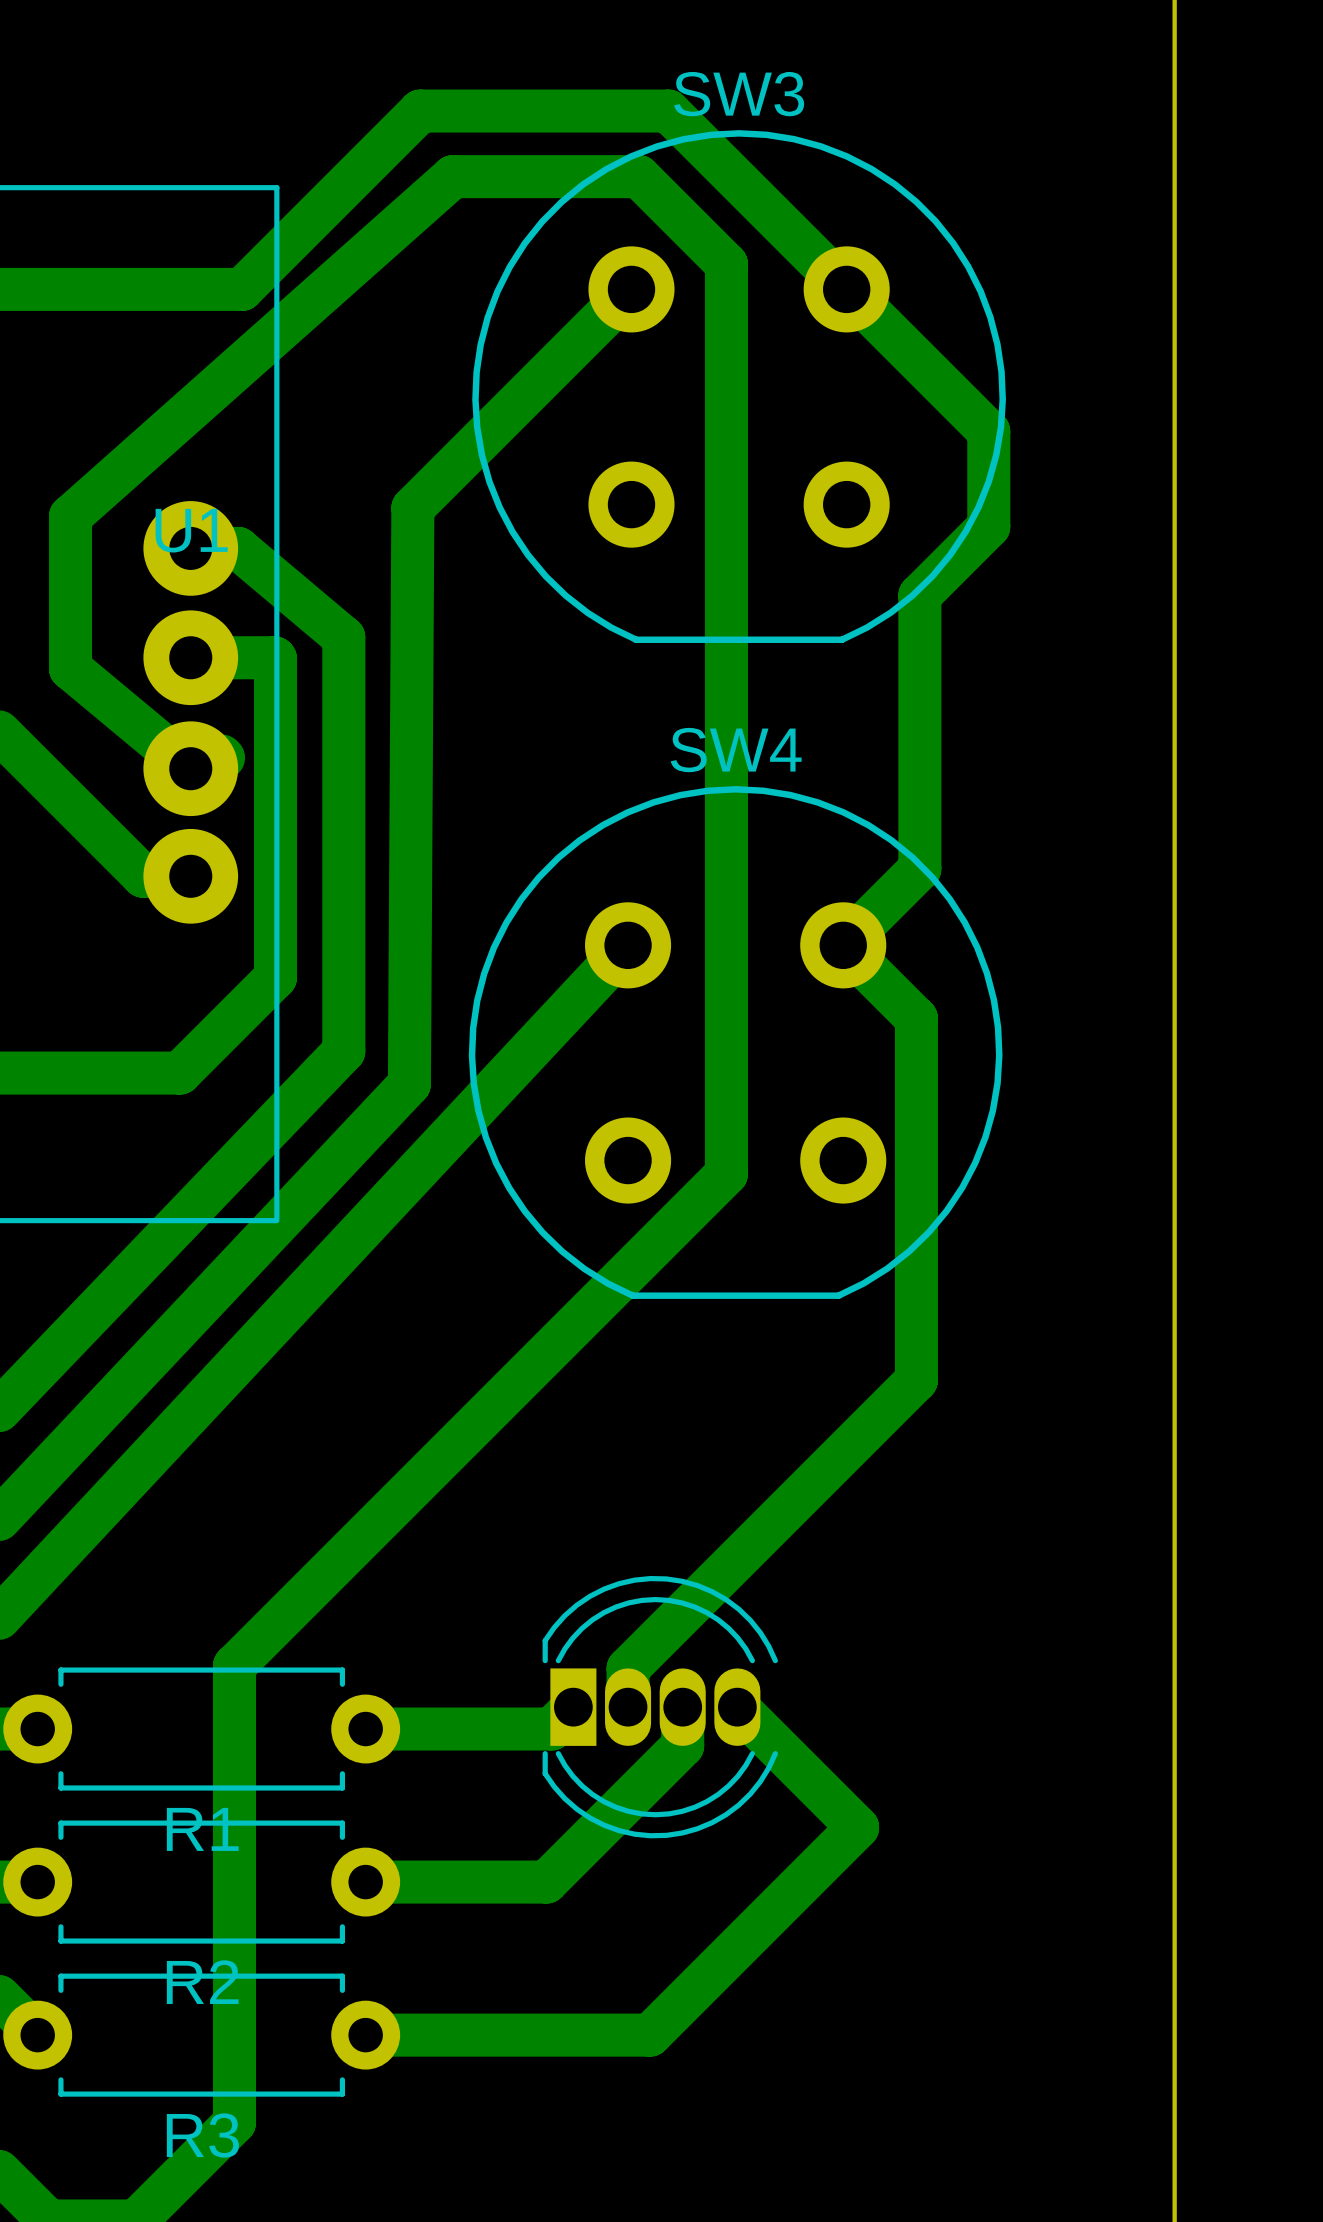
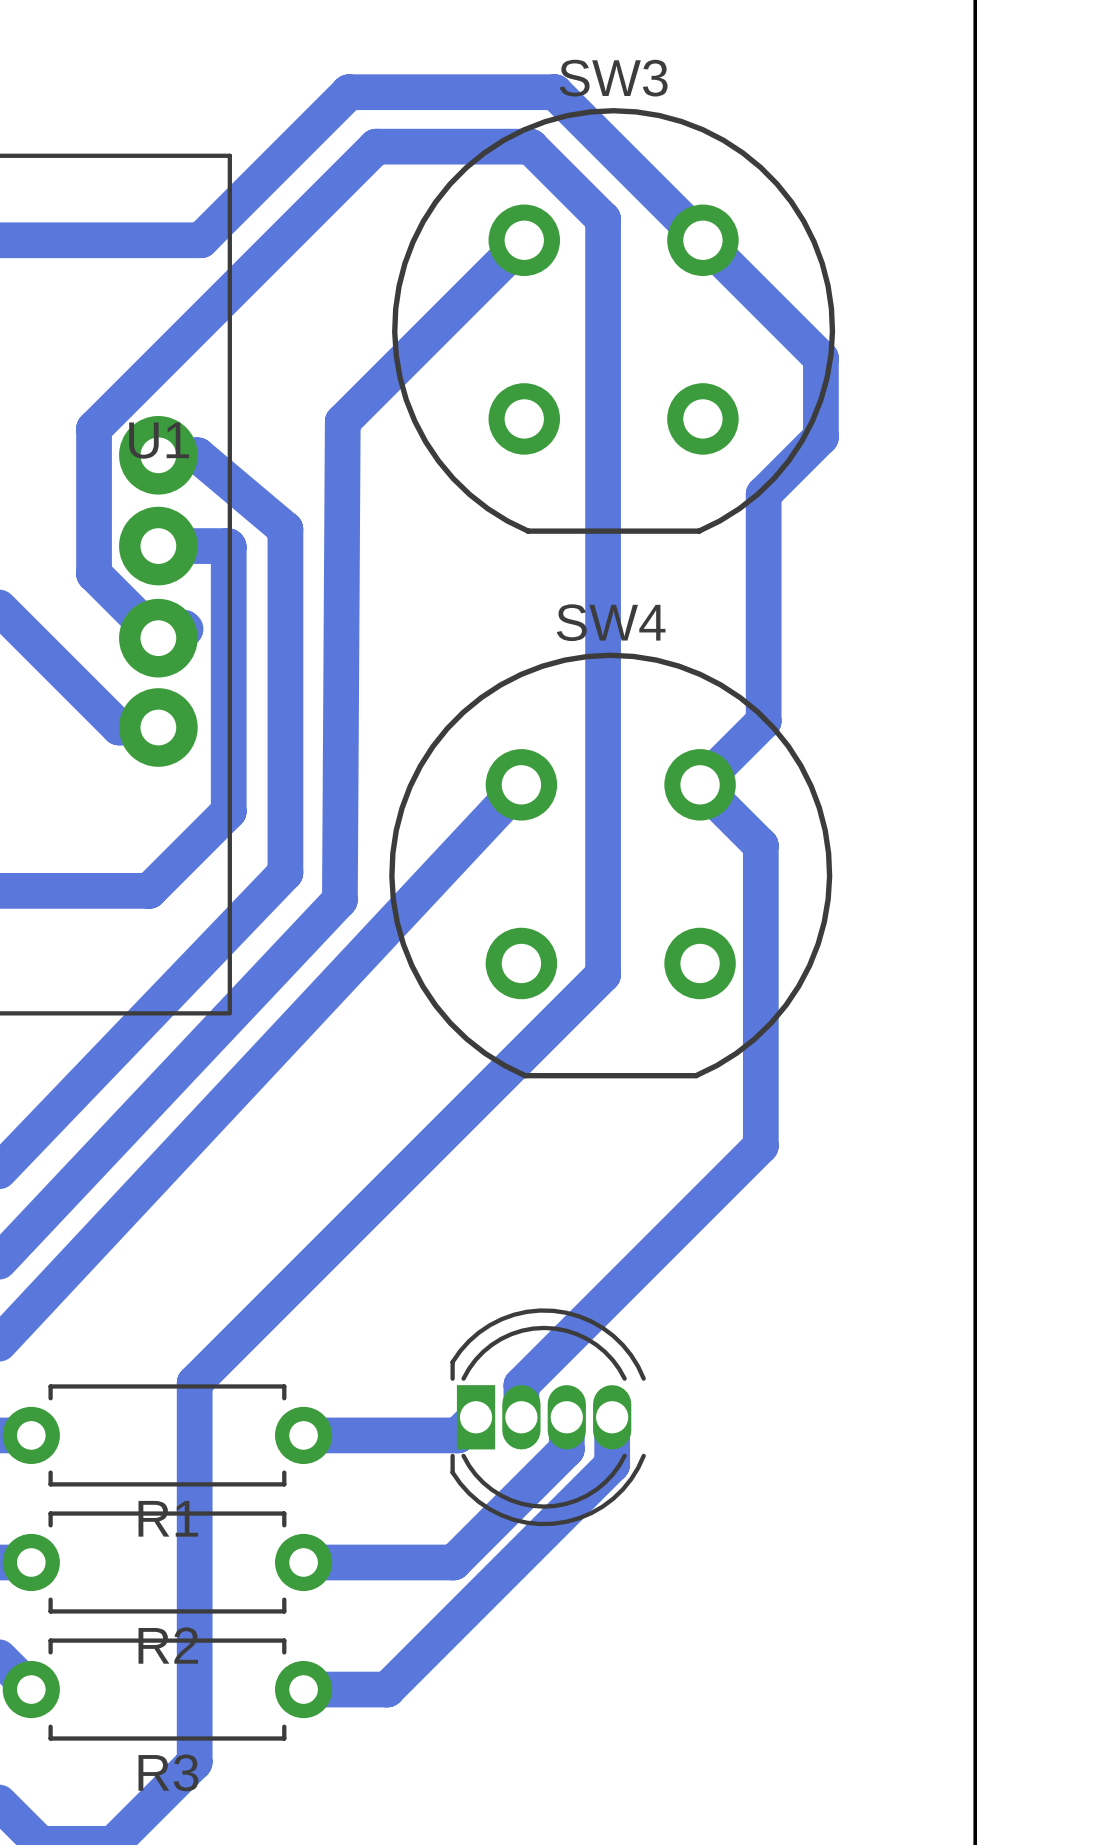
bottom track: (453, 176) (70, 516) (70, 668) (190, 768) -> (376, 146) (94, 428) (94, 573) (158, 638)
bottom track: (737, 1707) (857, 1827) (649, 2035) (466, 2035) -> (612, 1417) (612, 1464) (387, 1689)

